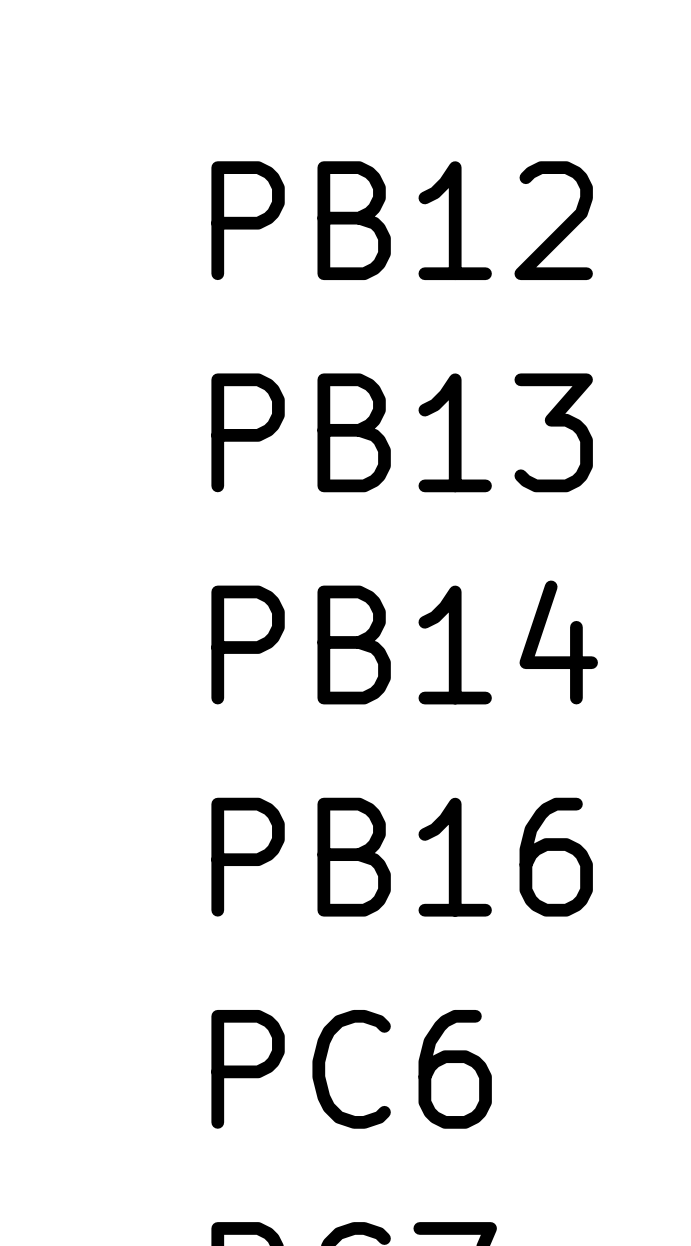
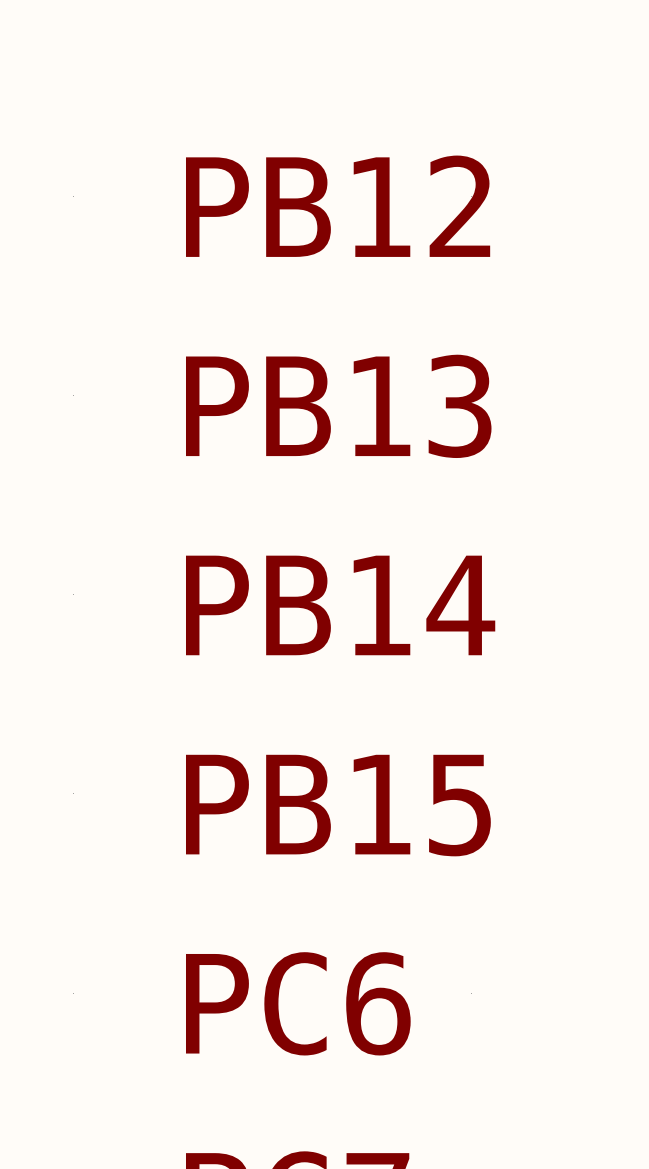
label: PB16 (402, 857) -> PB15 (338, 805)

